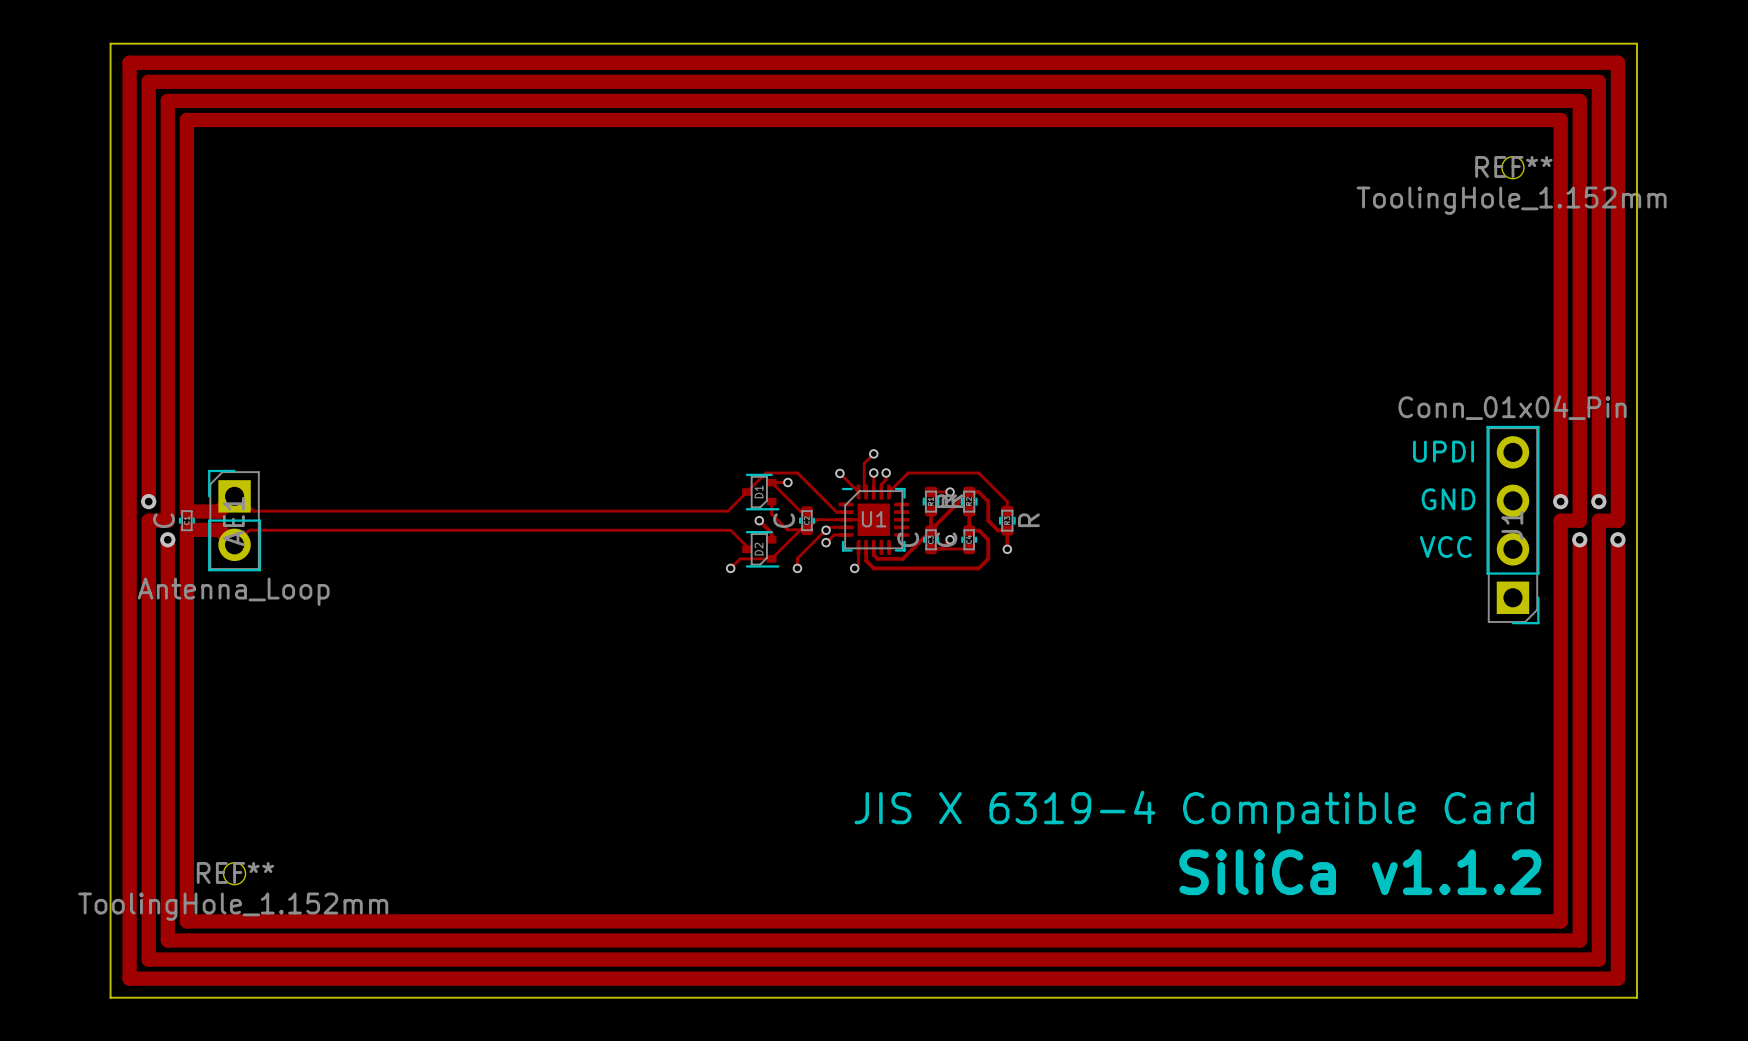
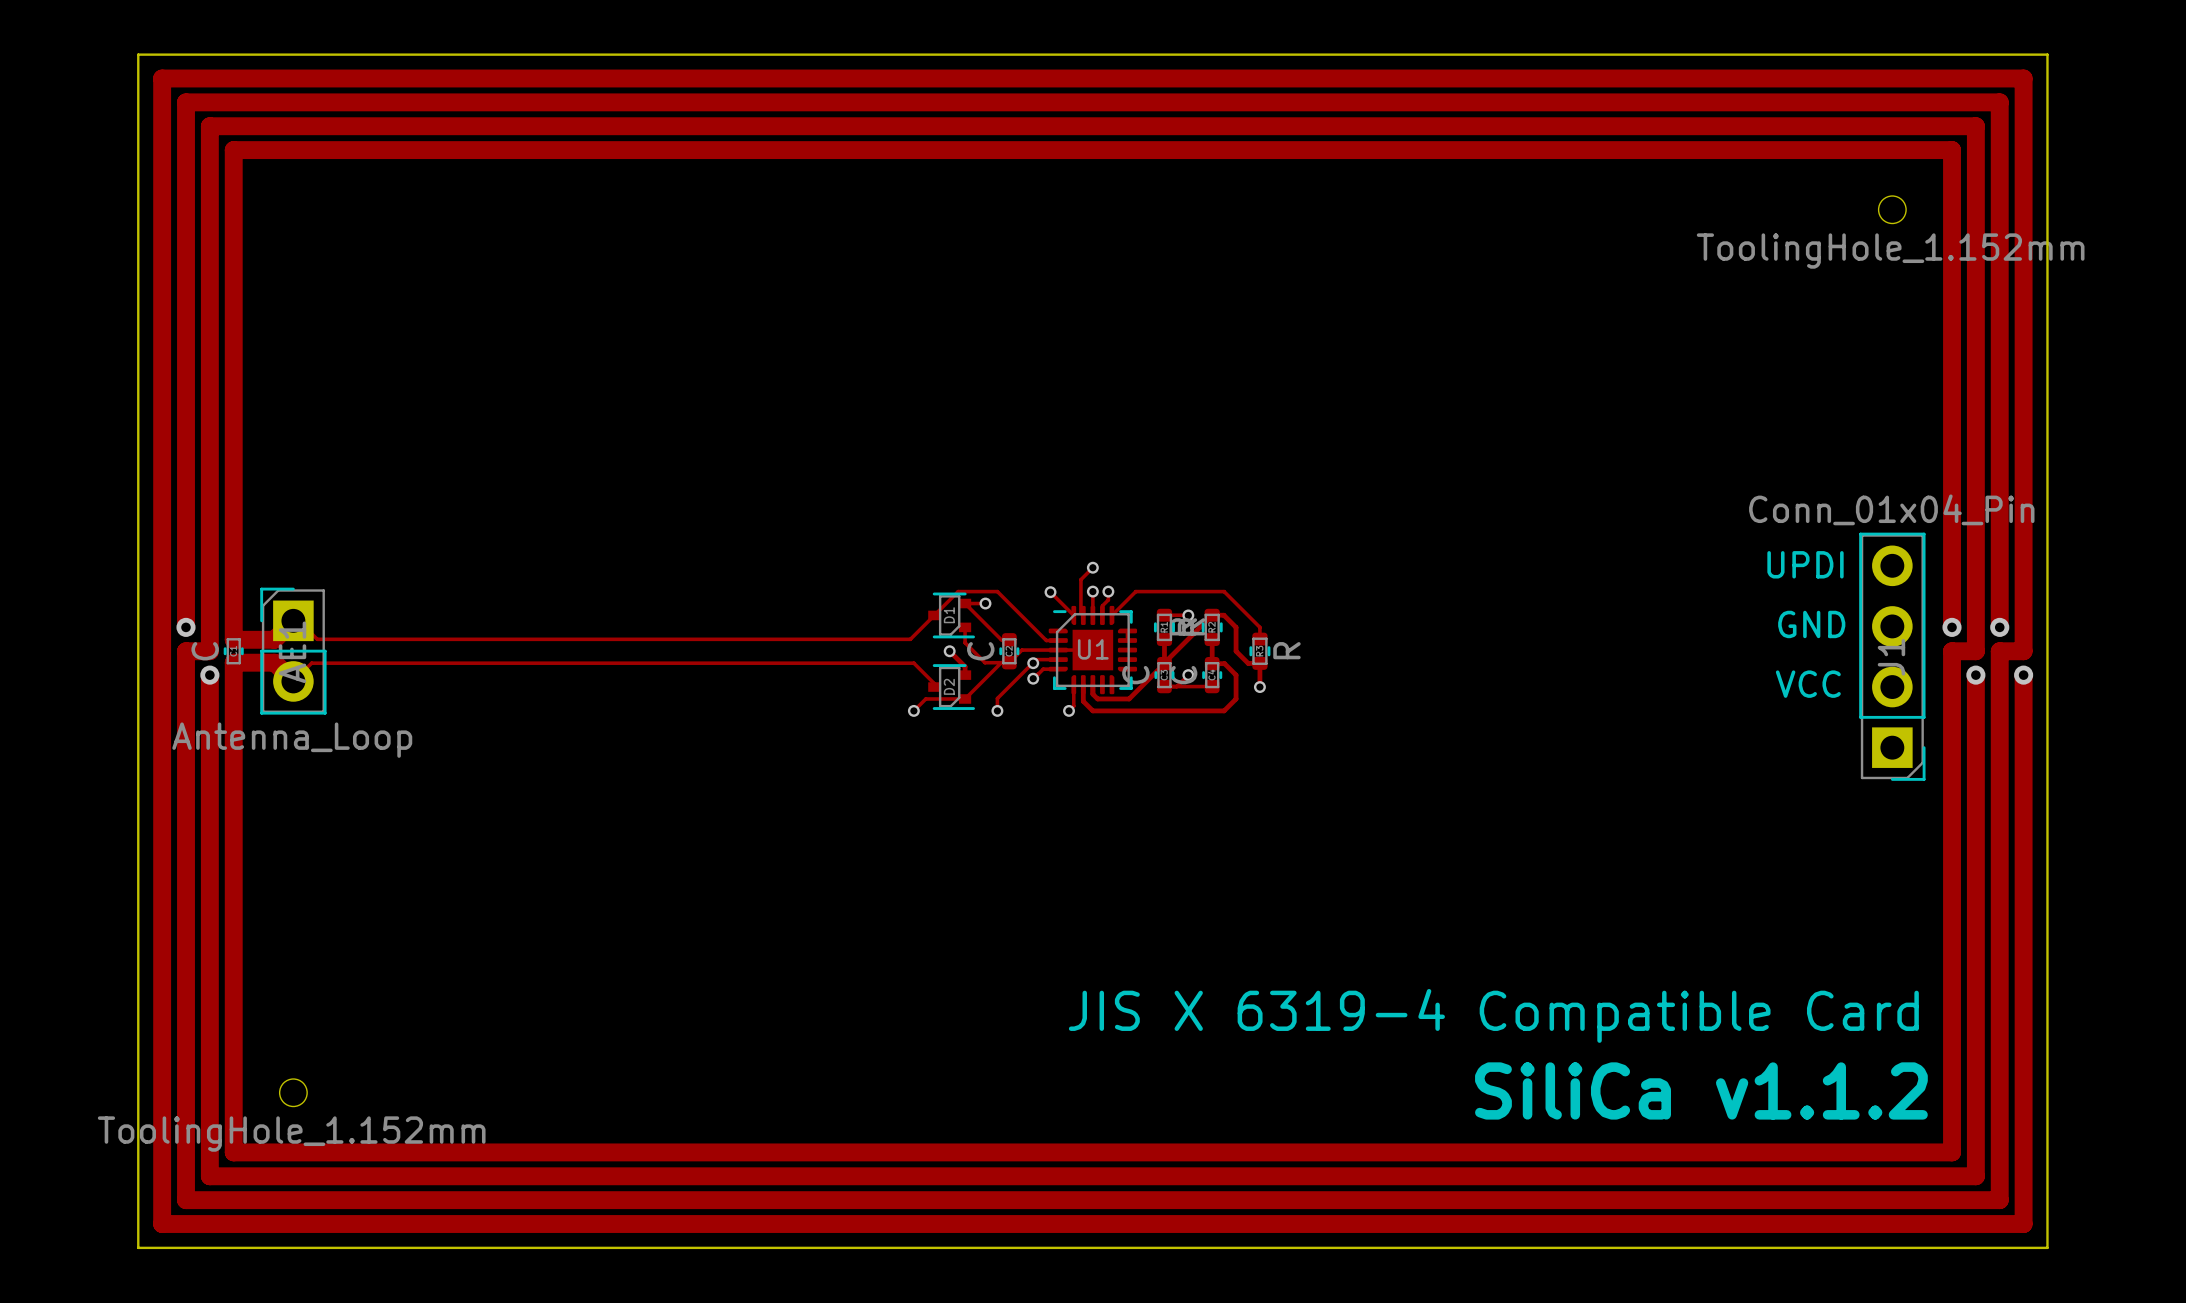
REF** name: REF** (1513, 166) -> none
REF** name: REF** (235, 872) -> none

